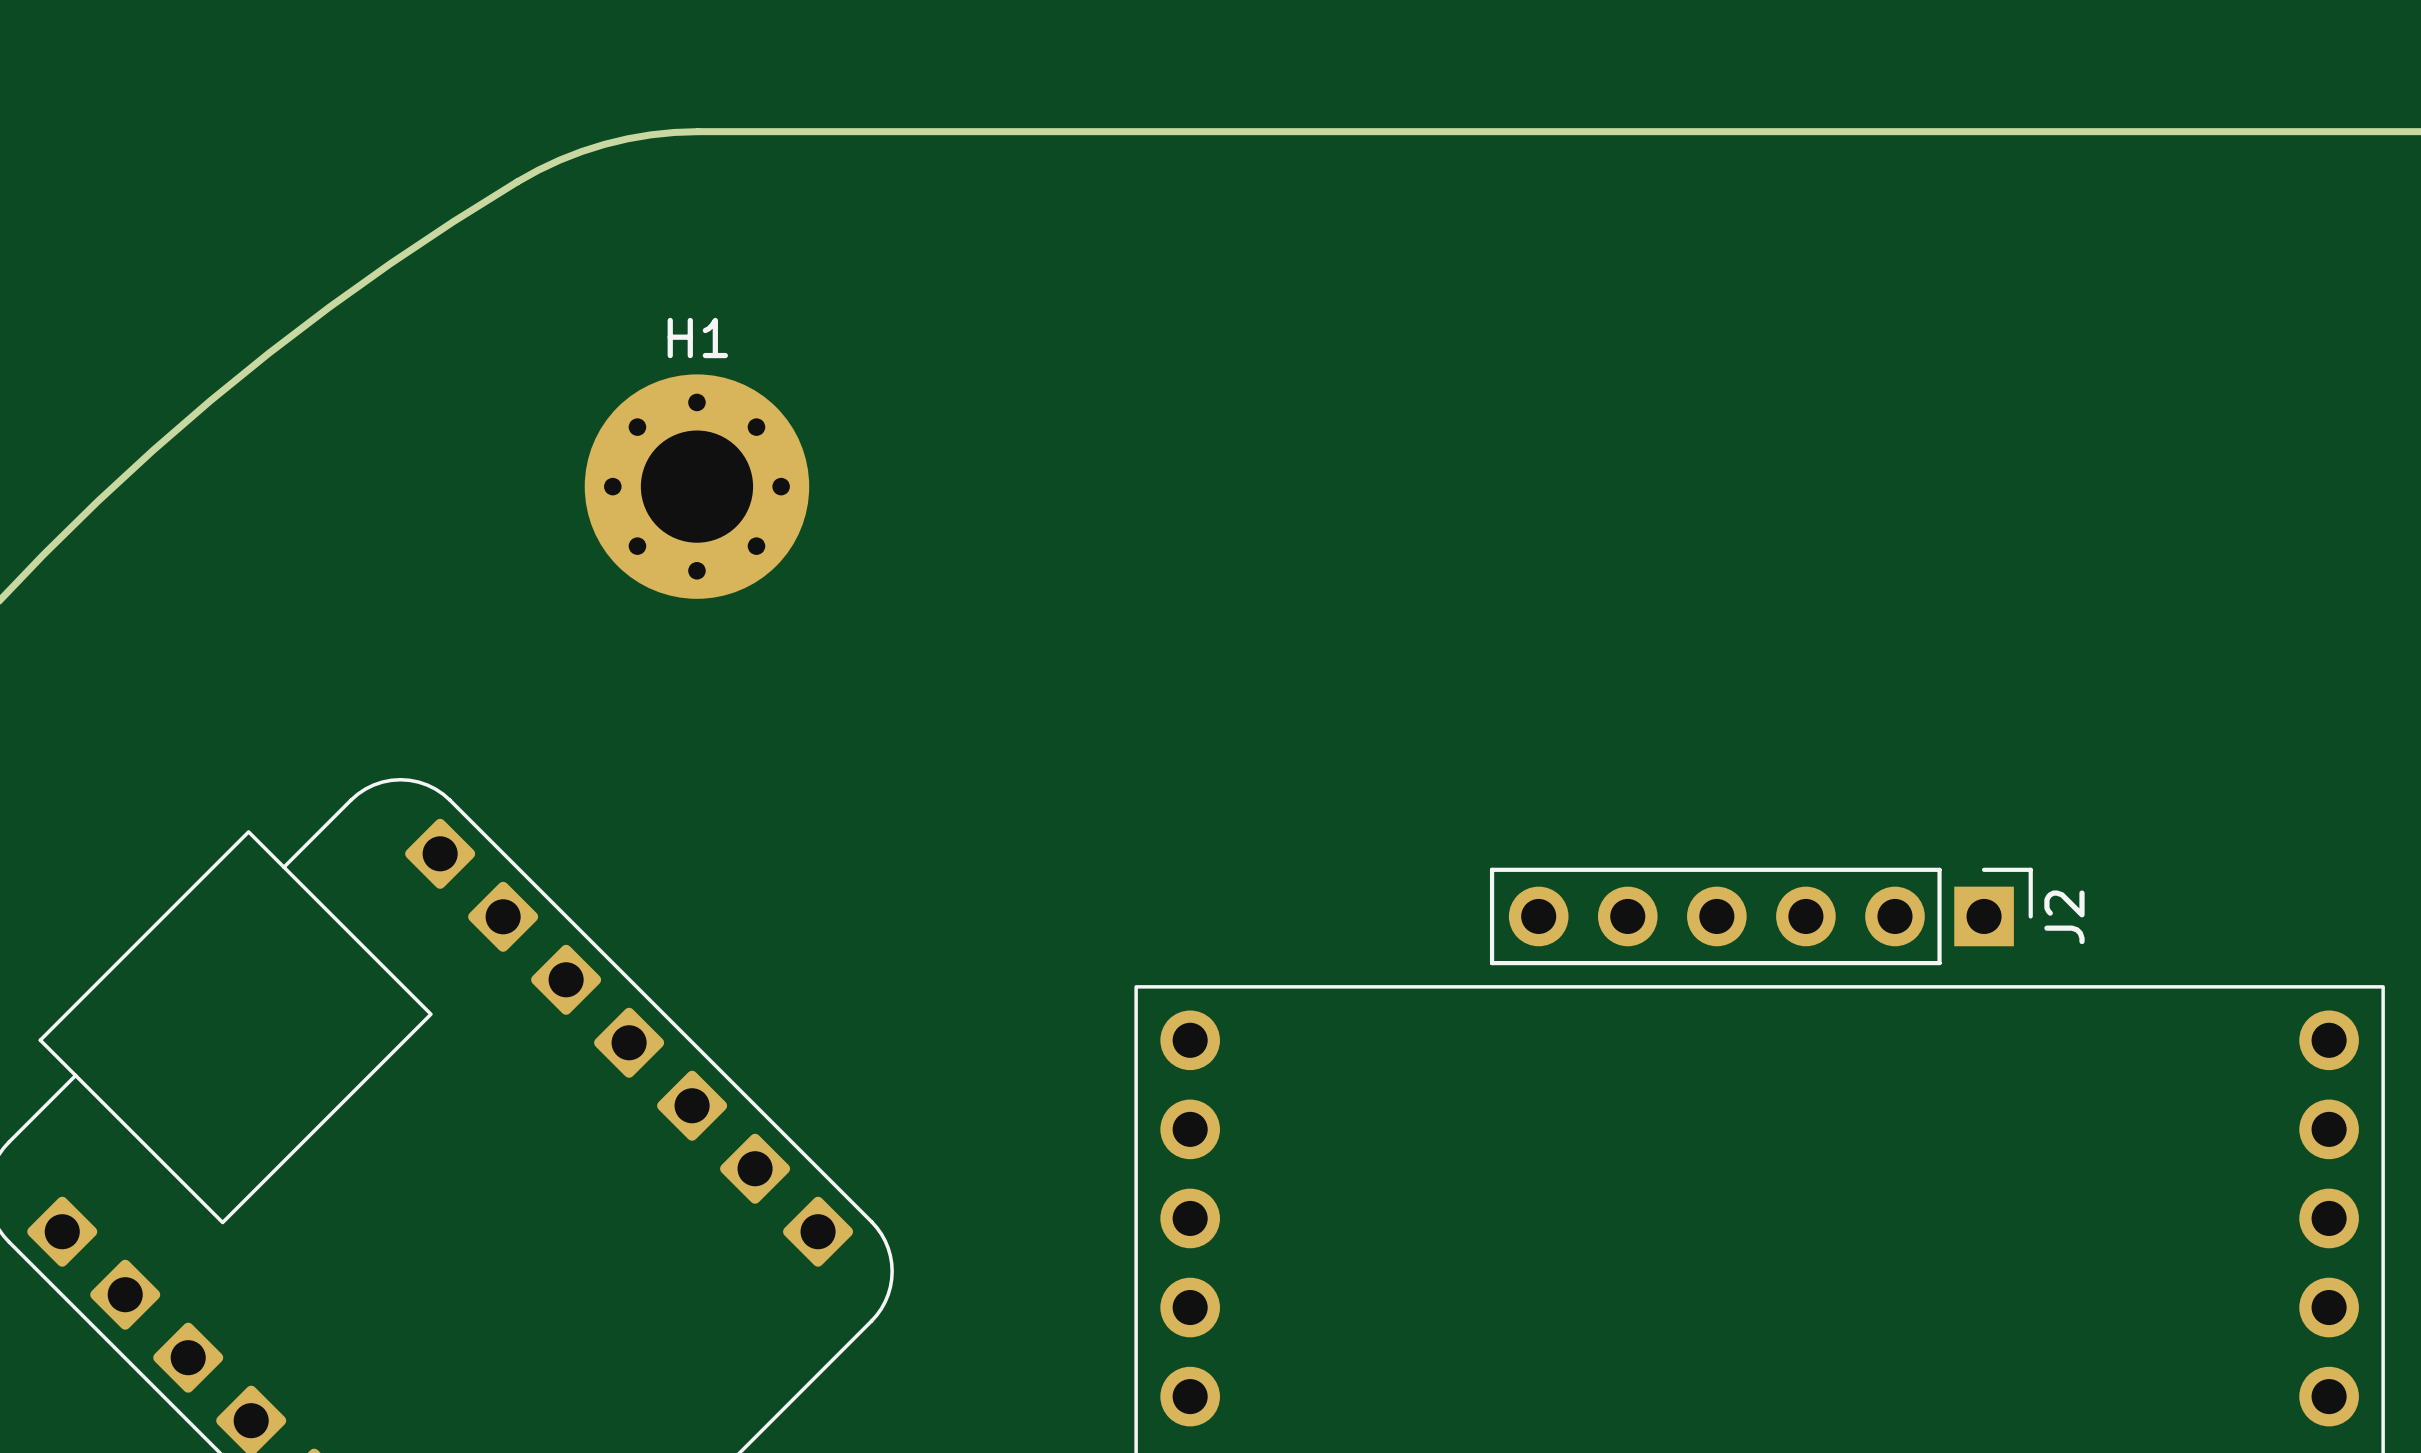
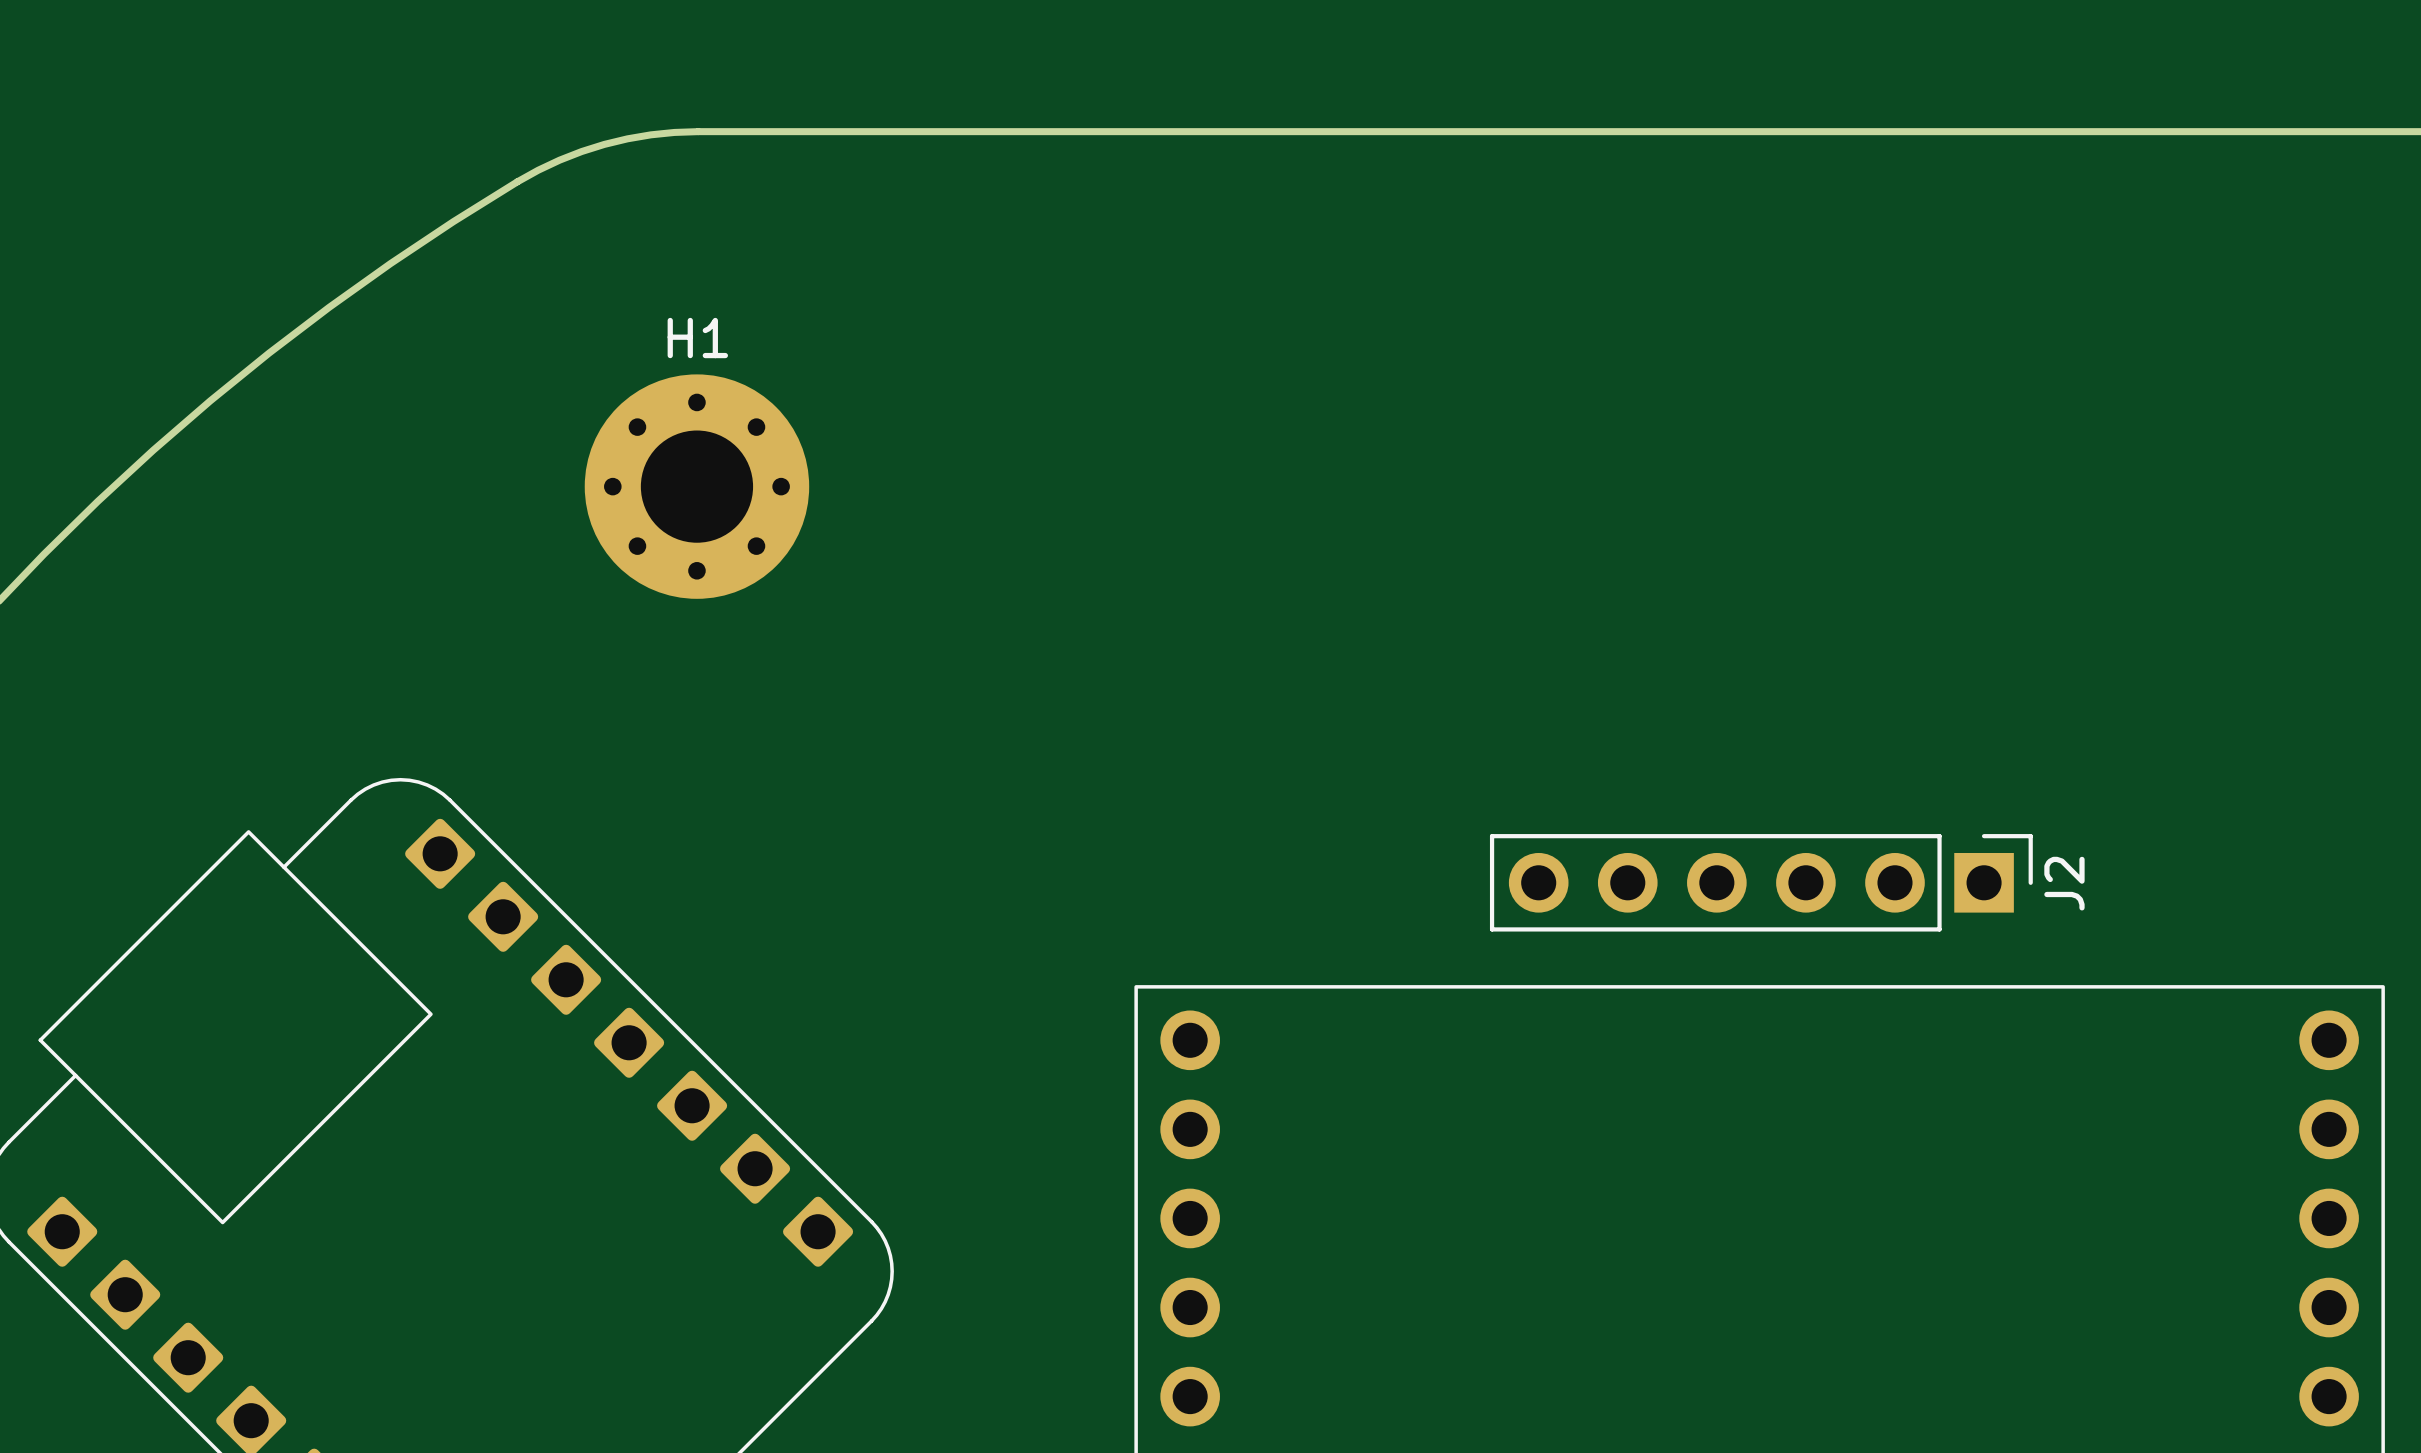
J2 position: (1761, 916) -> (1761, 882)

